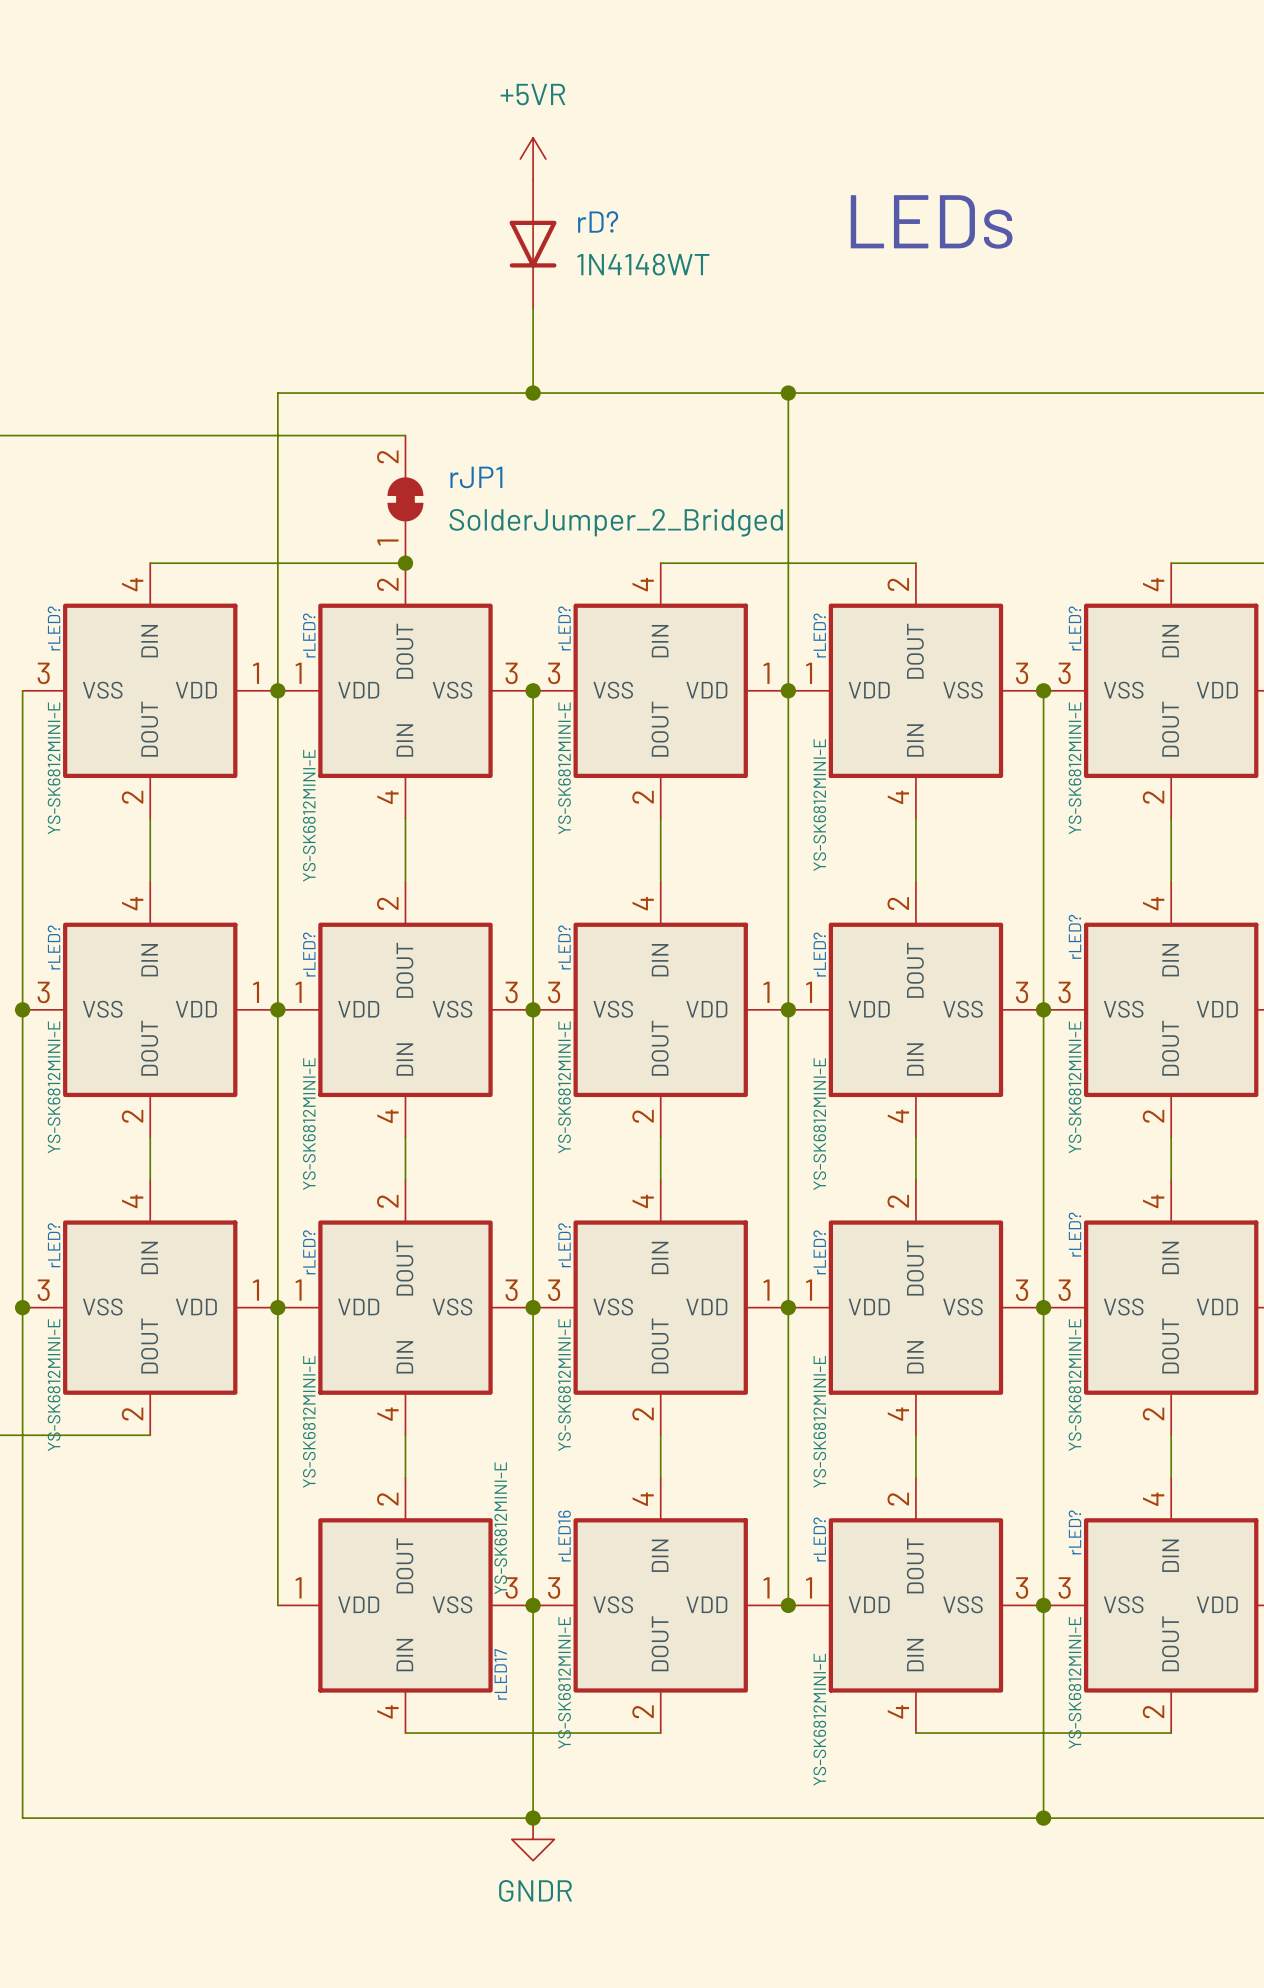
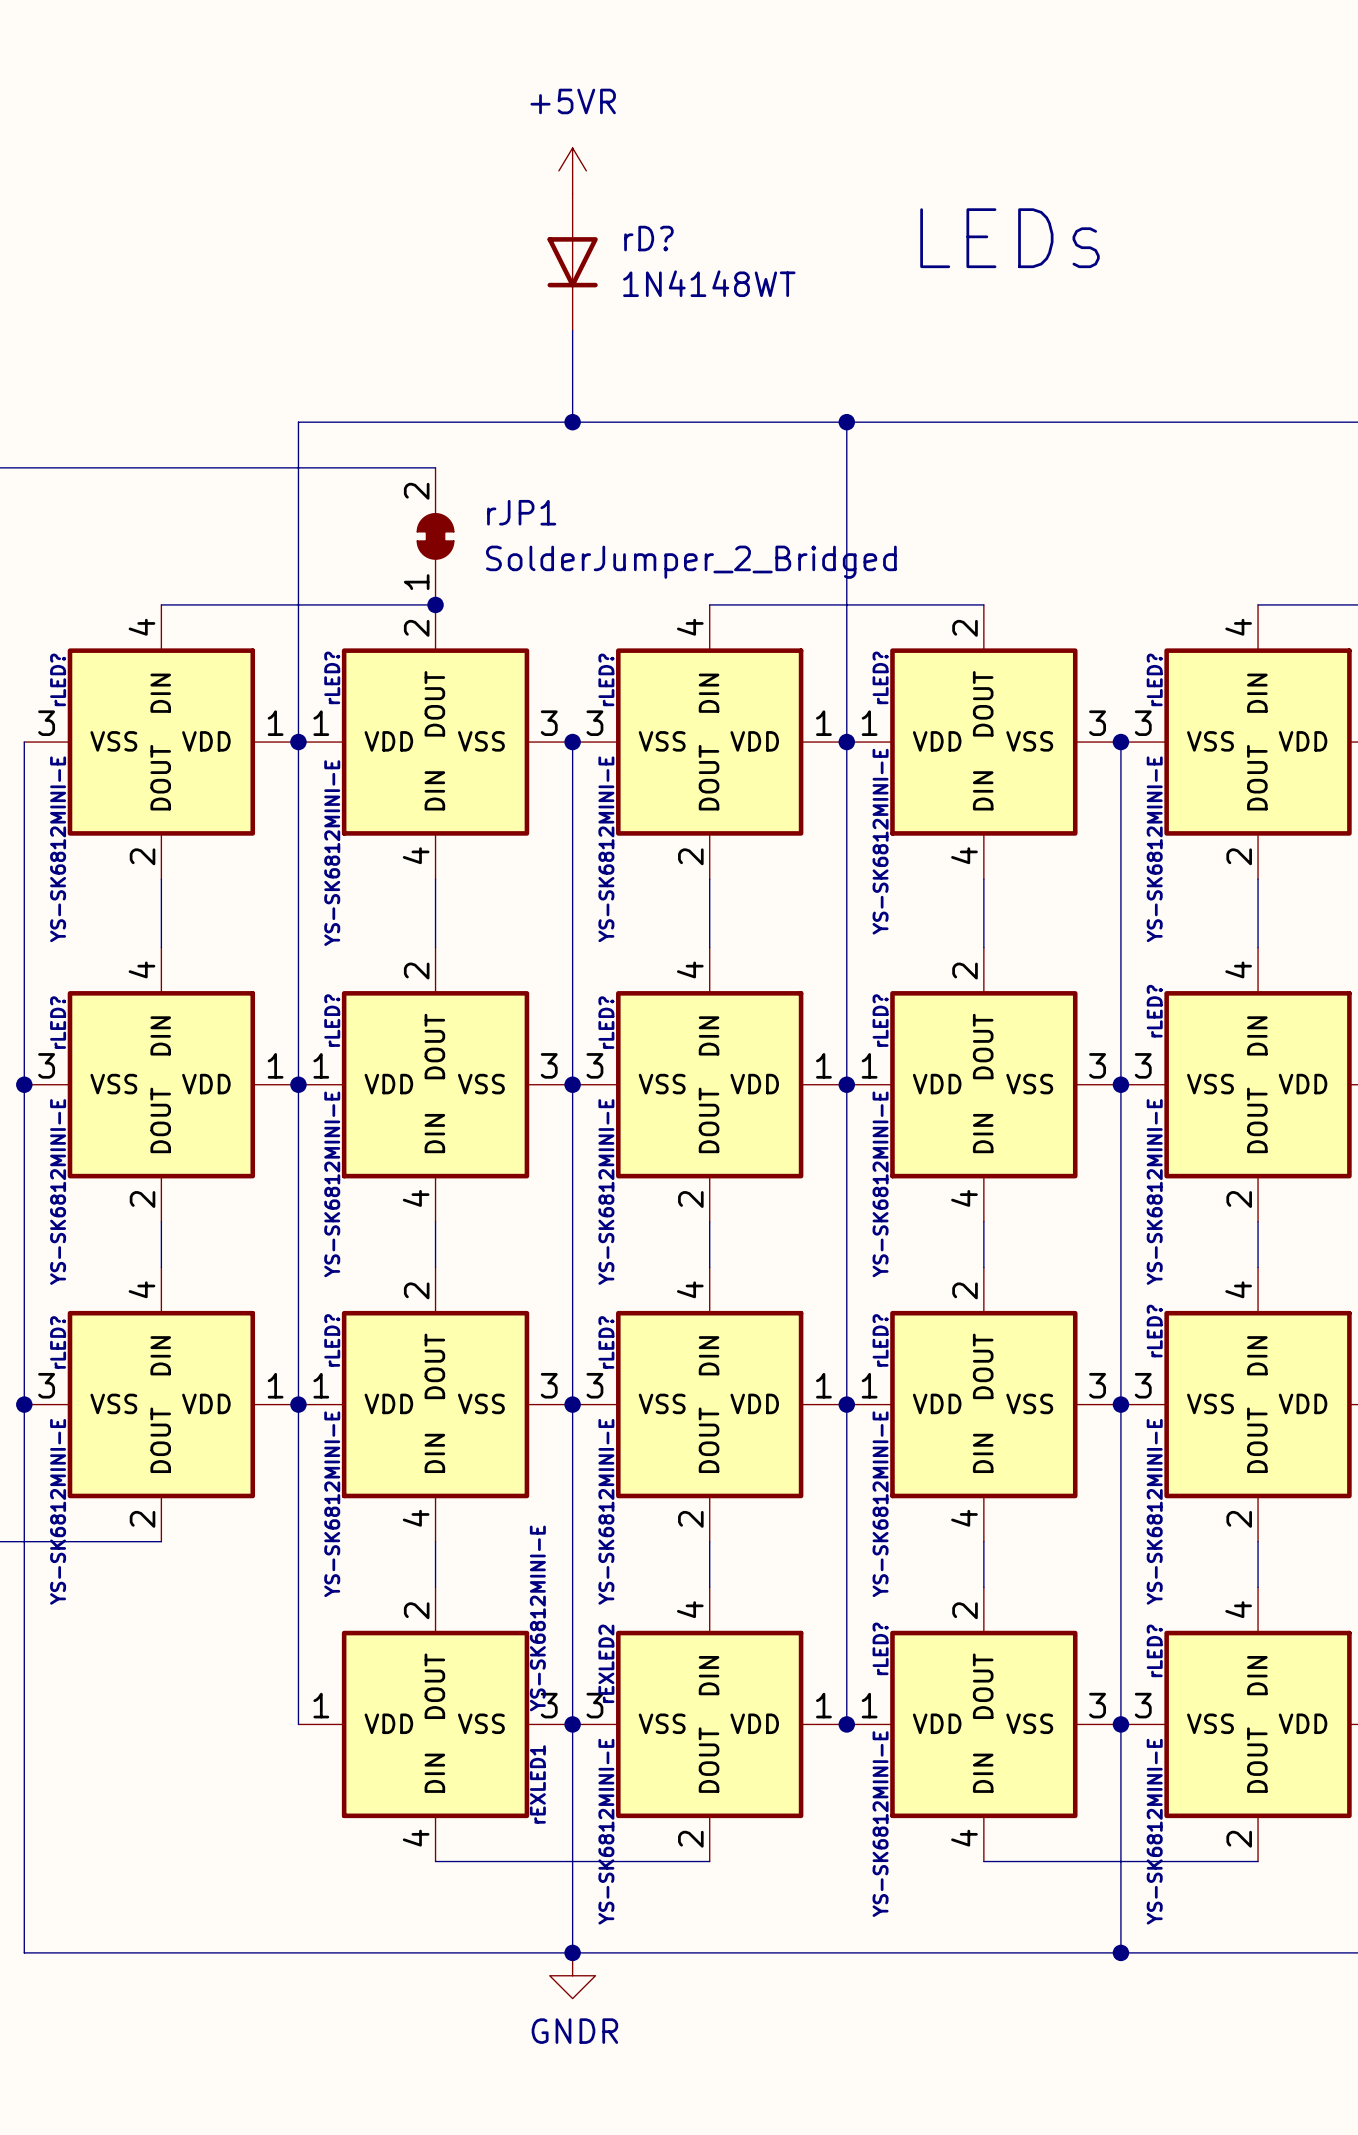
rLED16 name: rLED16 (564, 1536) -> rEXLED2 (606, 1663)
rLED17 name: rLED17 (500, 1674) -> rEXLED1 (537, 1784)

